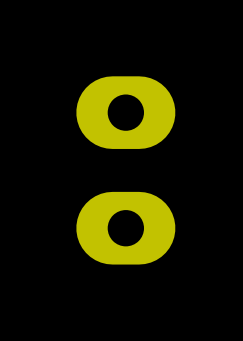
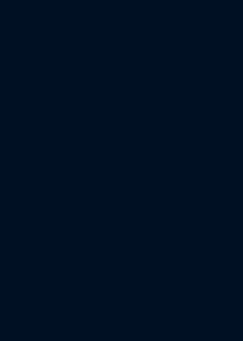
part: (125, 170) -> none

